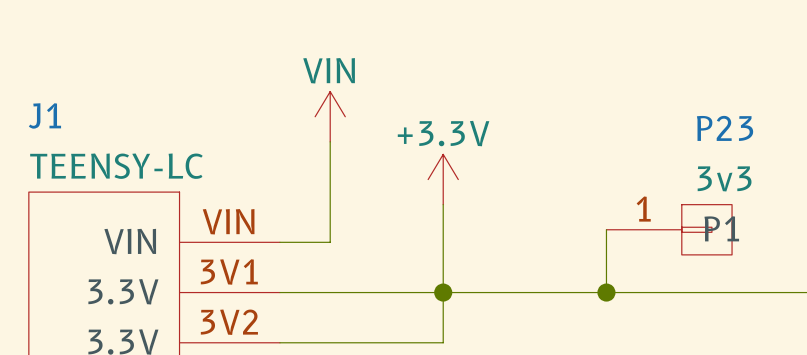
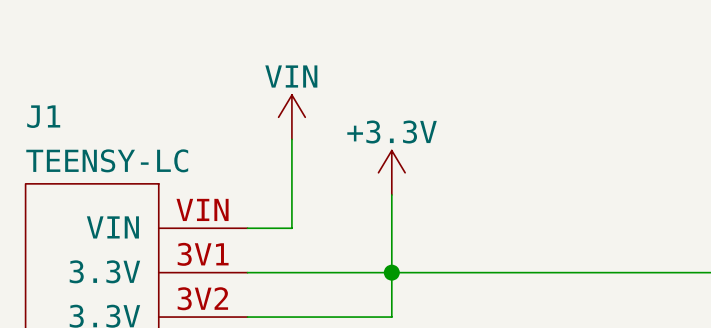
wire: (606, 229) (606, 292) -> none
P23: 3v3 (669, 229) -> none
junction: (606, 292) -> none

